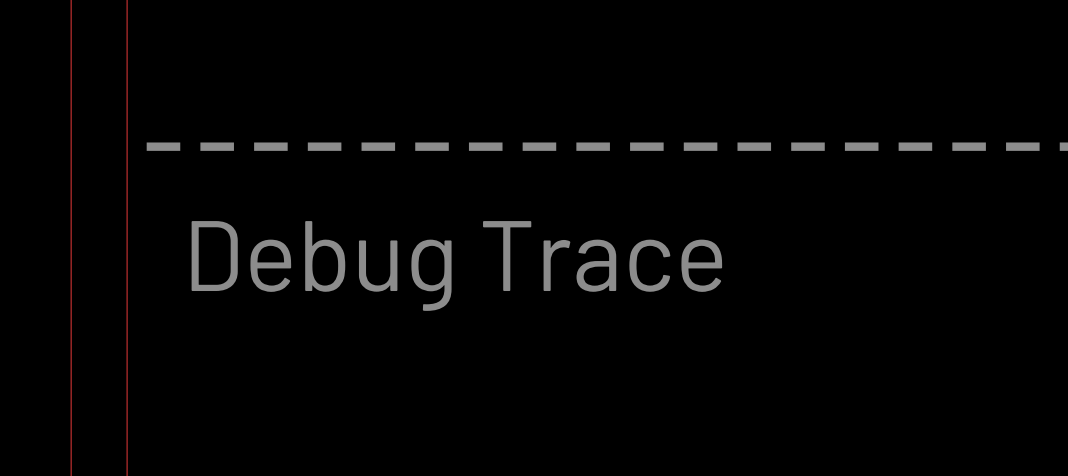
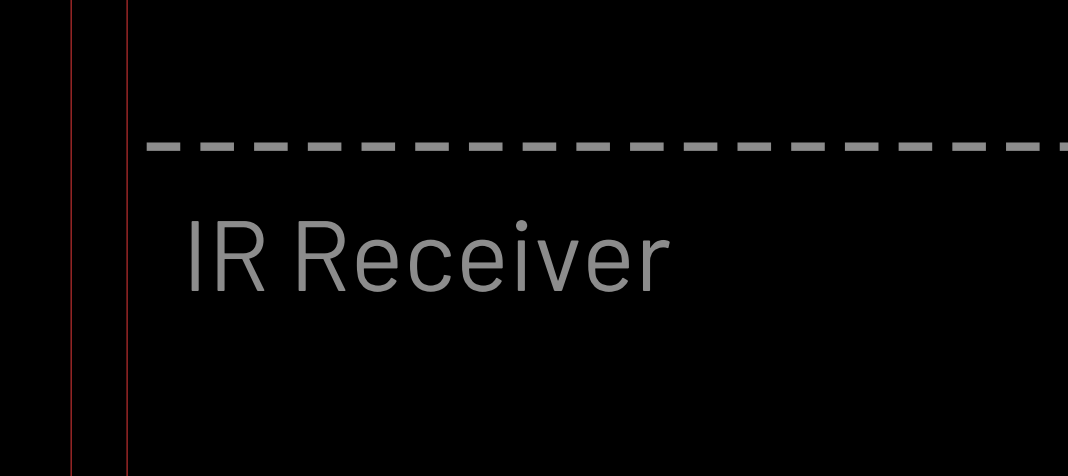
text: Debug Trace (456, 265) -> IR Receiver (430, 255)

